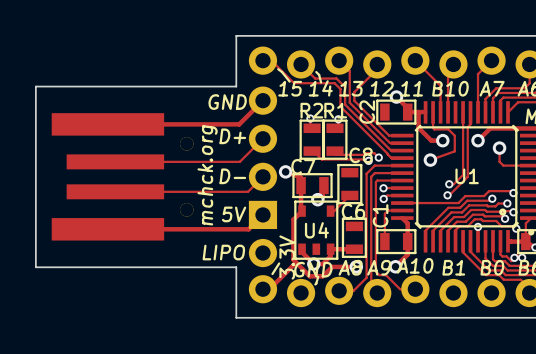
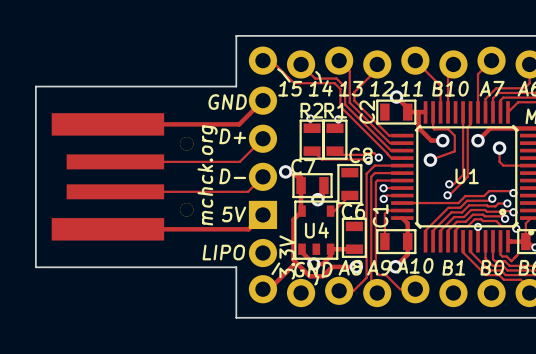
via: (514, 257) -> none
via: (522, 257) -> none

